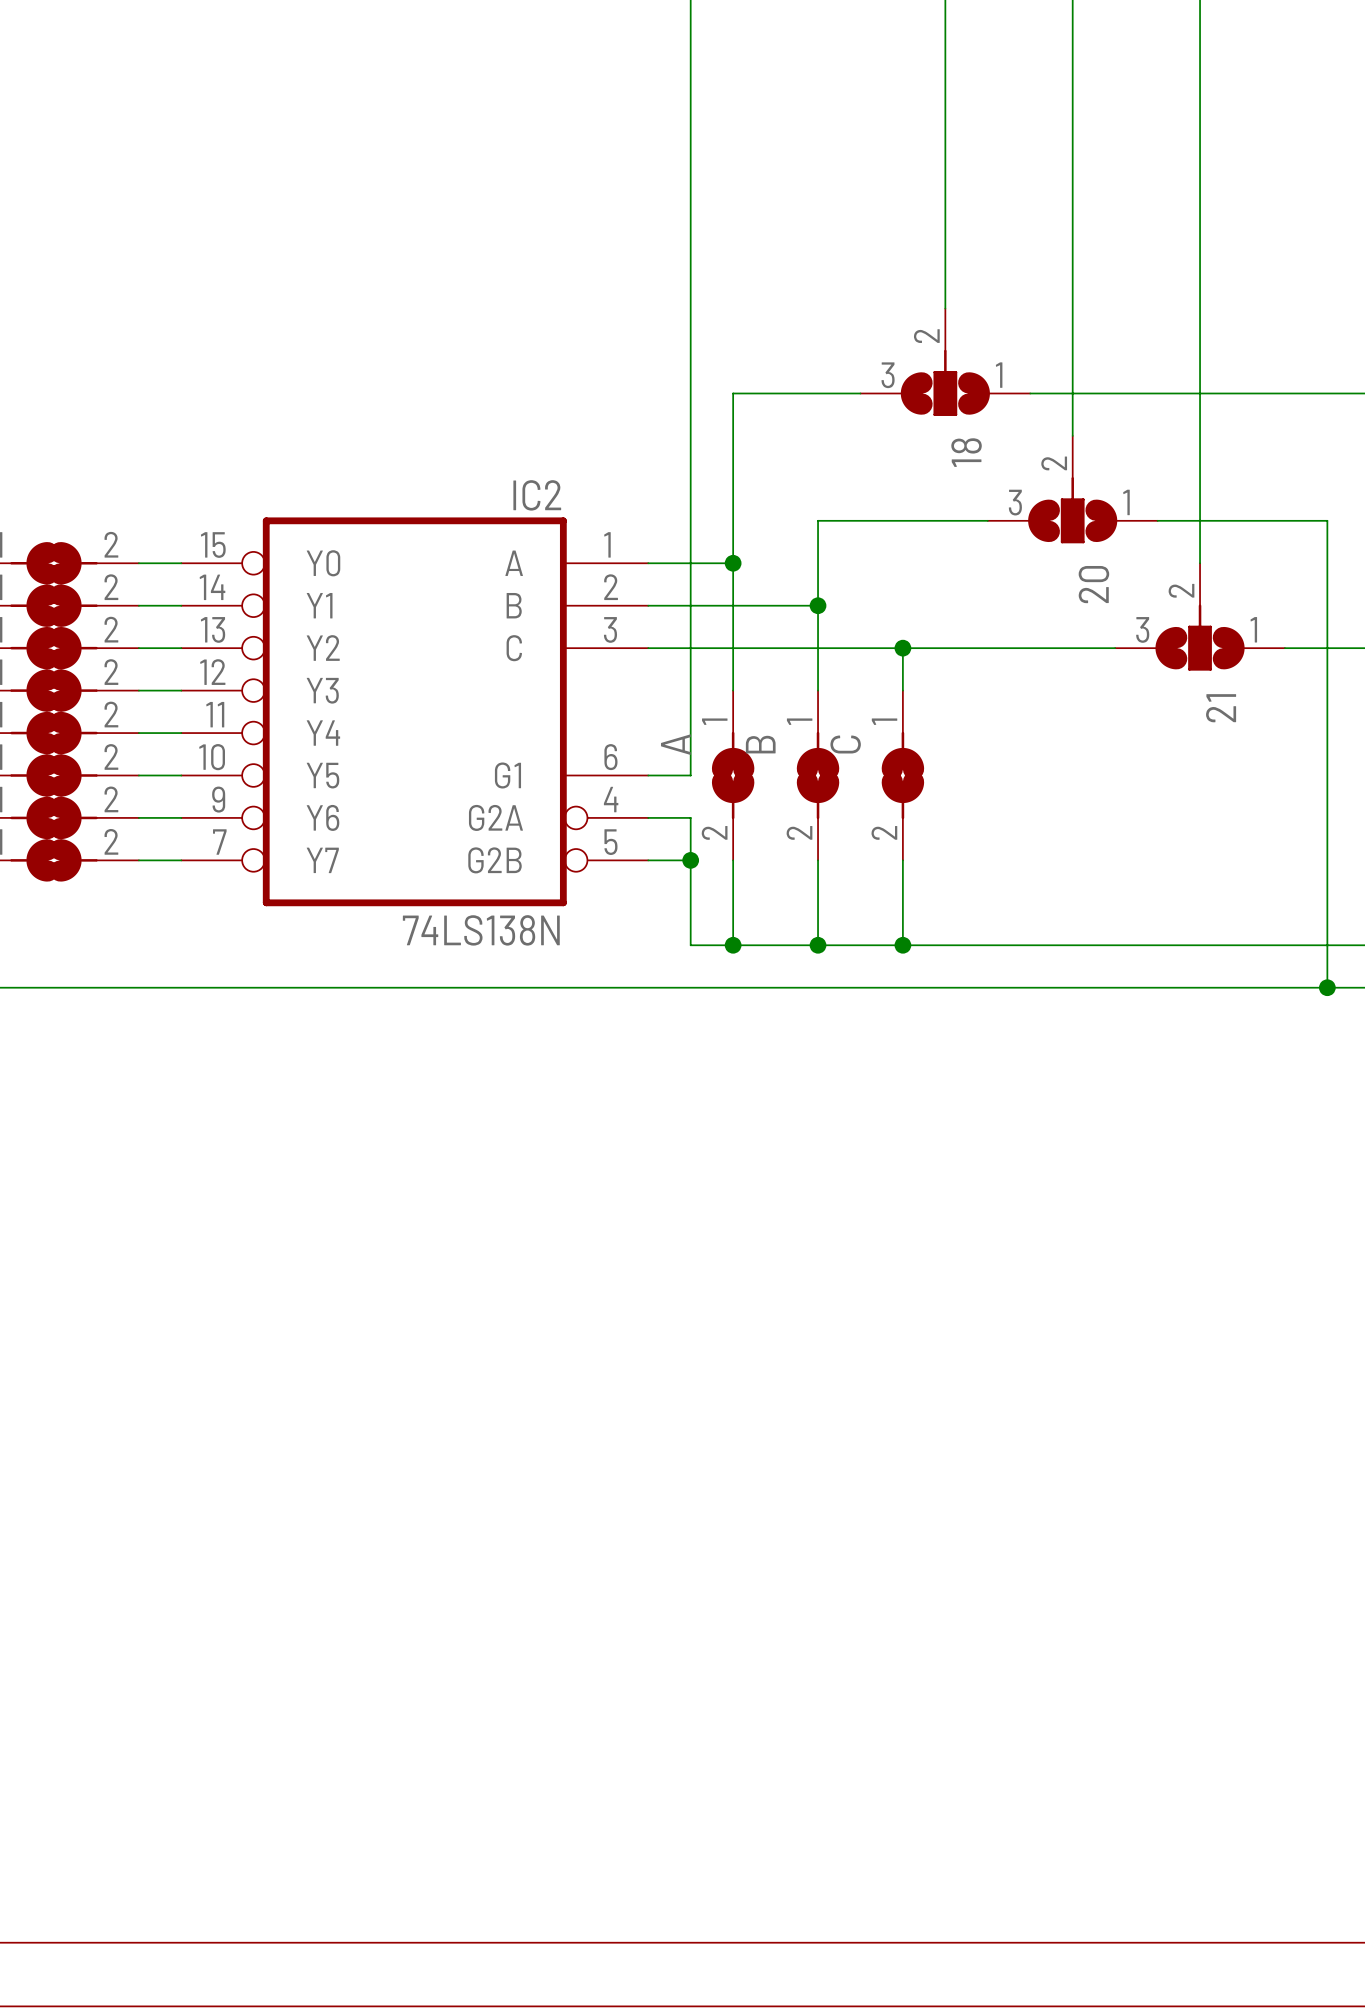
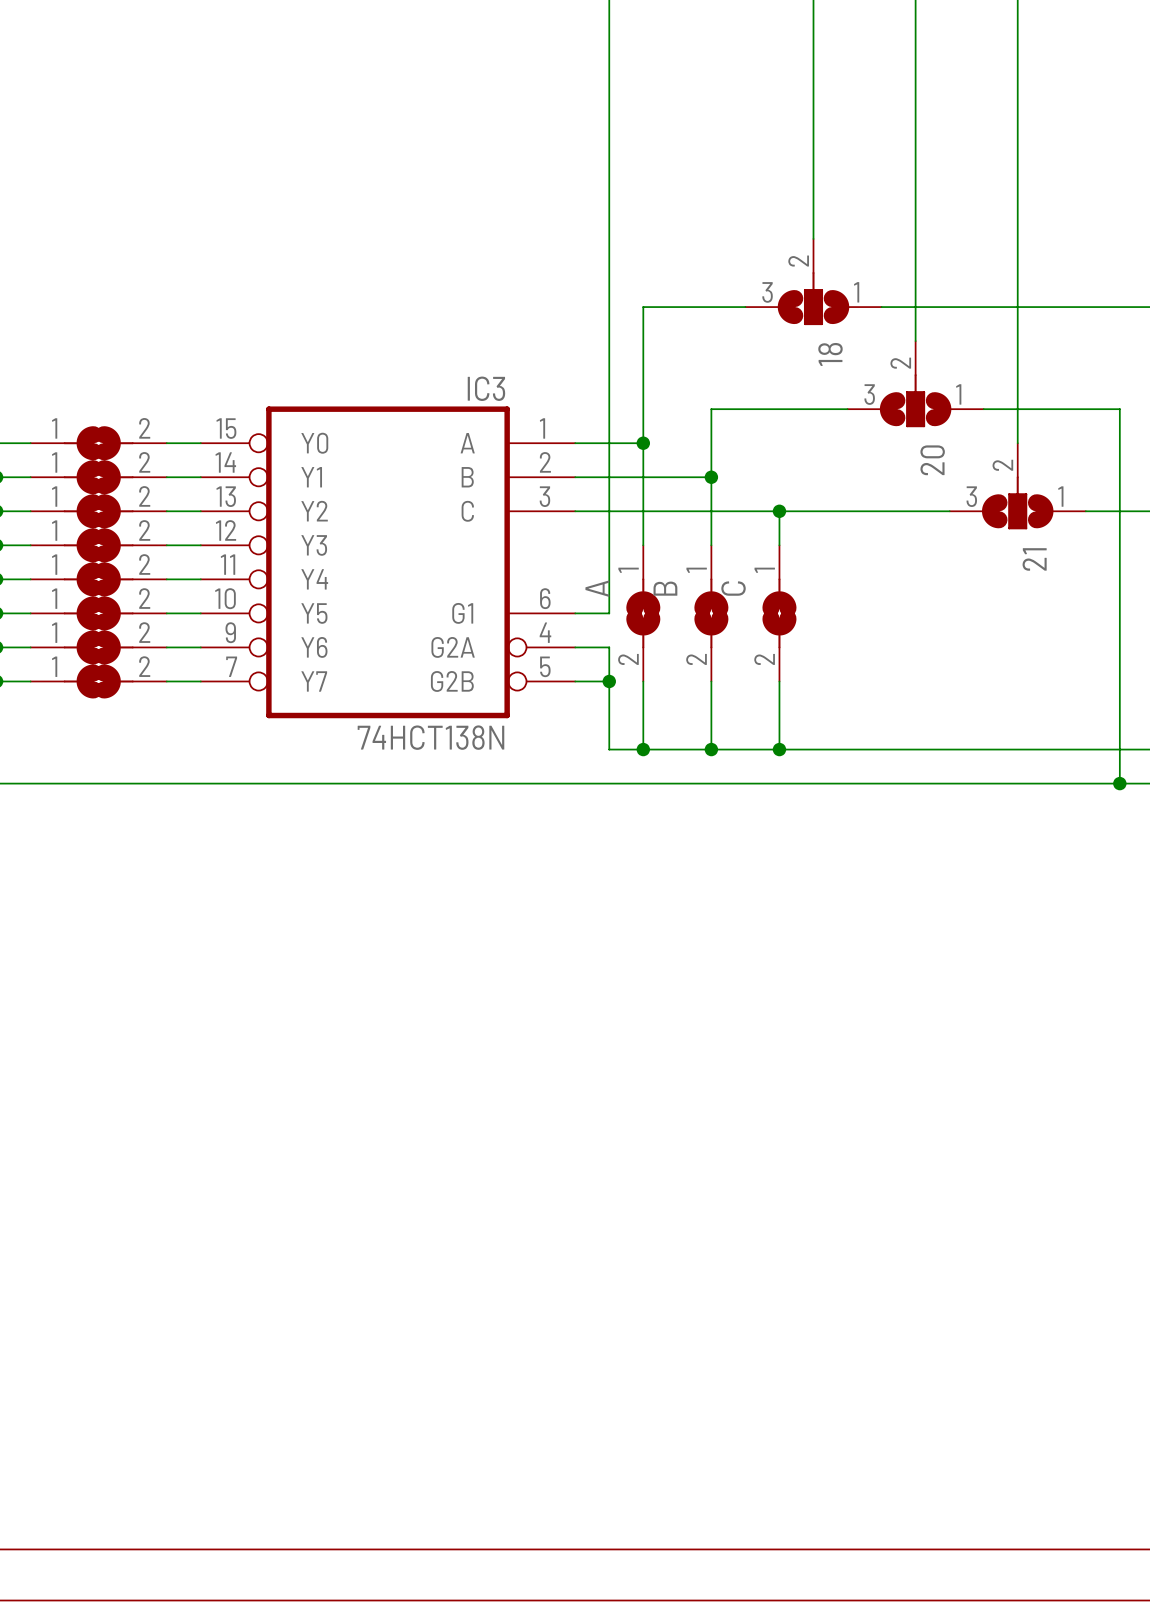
IC2 name: IC2 (537, 495) -> IC3 (486, 388)
IC2 value: 74LS138N (481, 930) -> 74HCT138N (430, 737)

